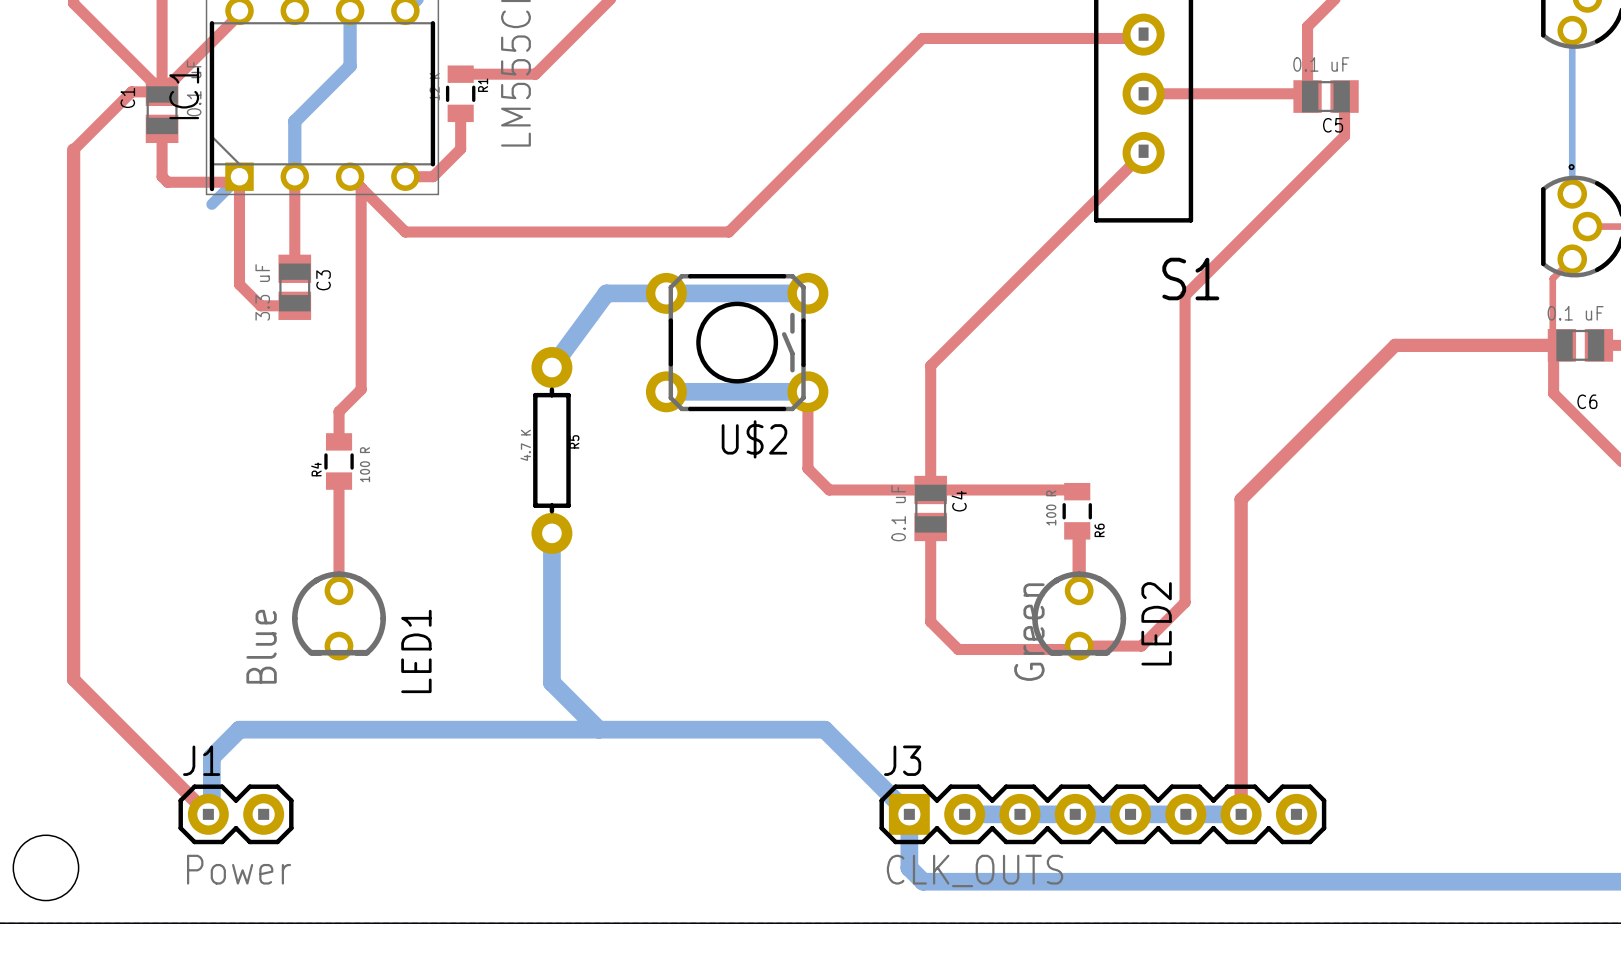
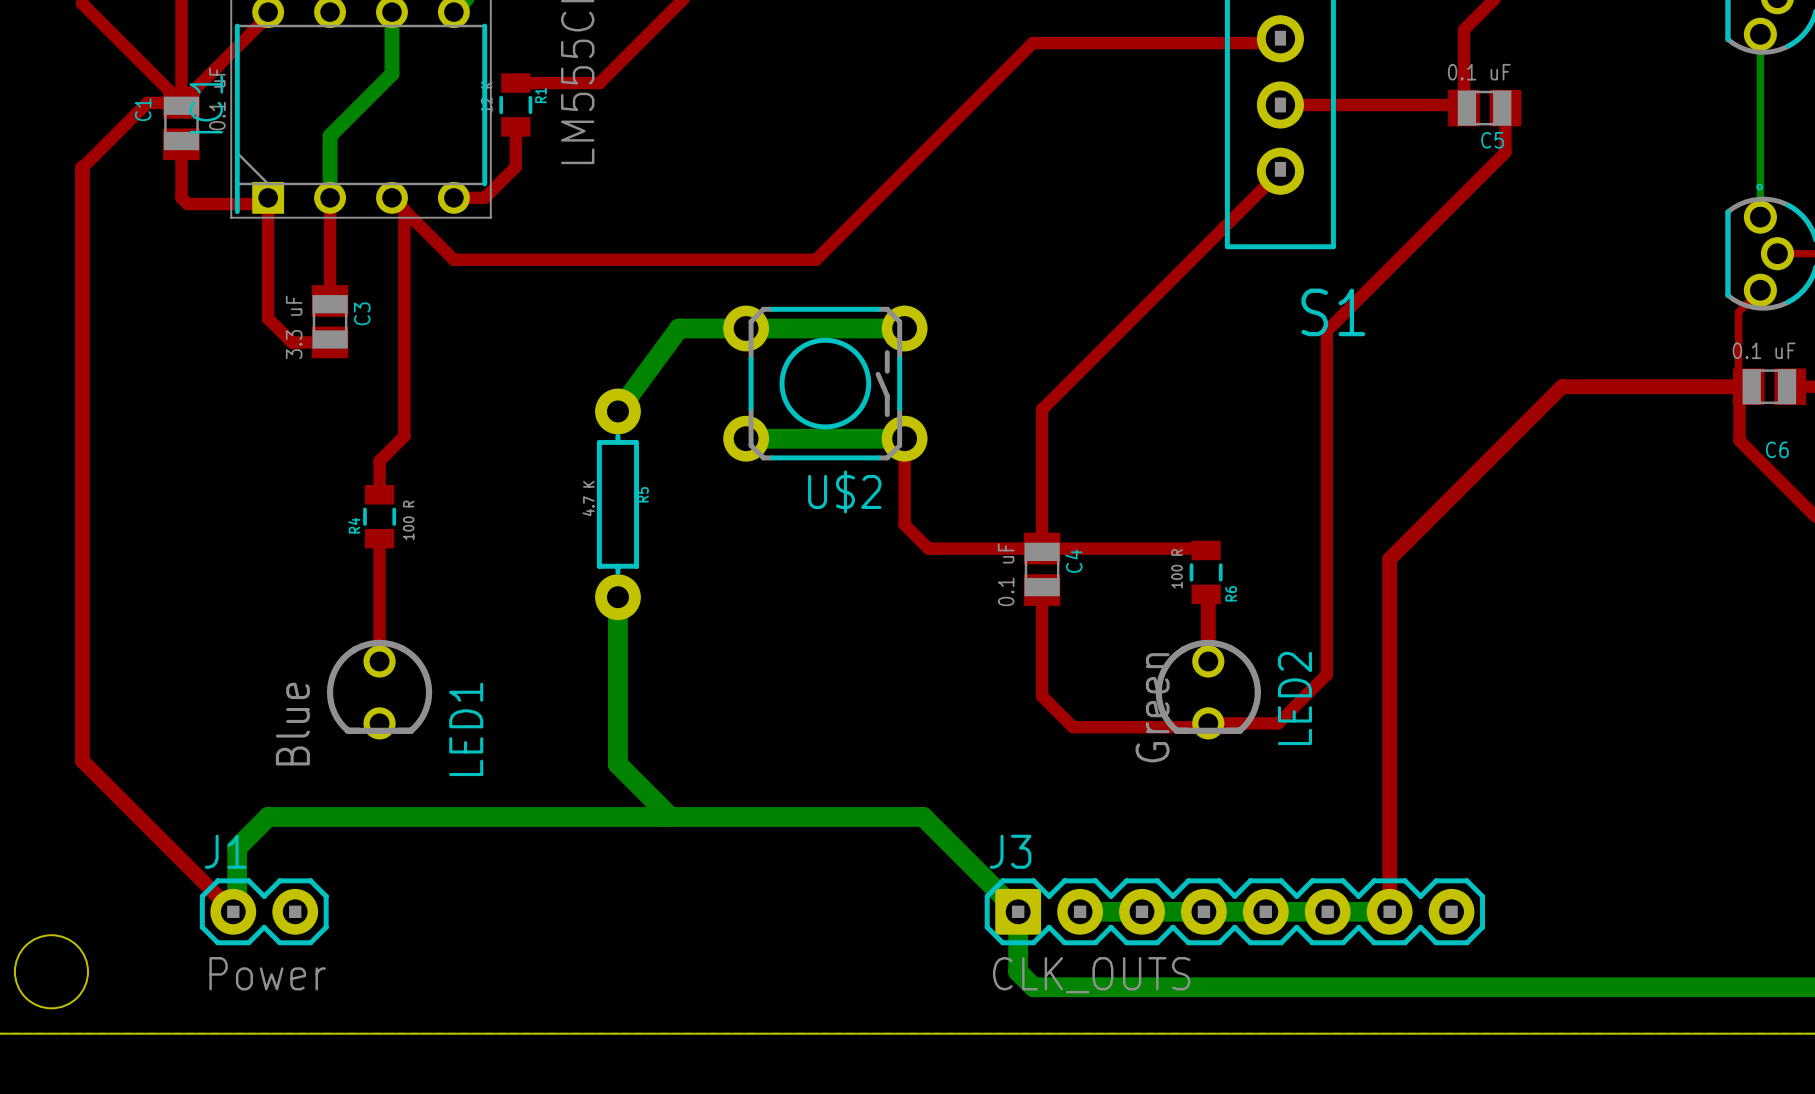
bottom track: (239, 176) (211, 204) -> none

